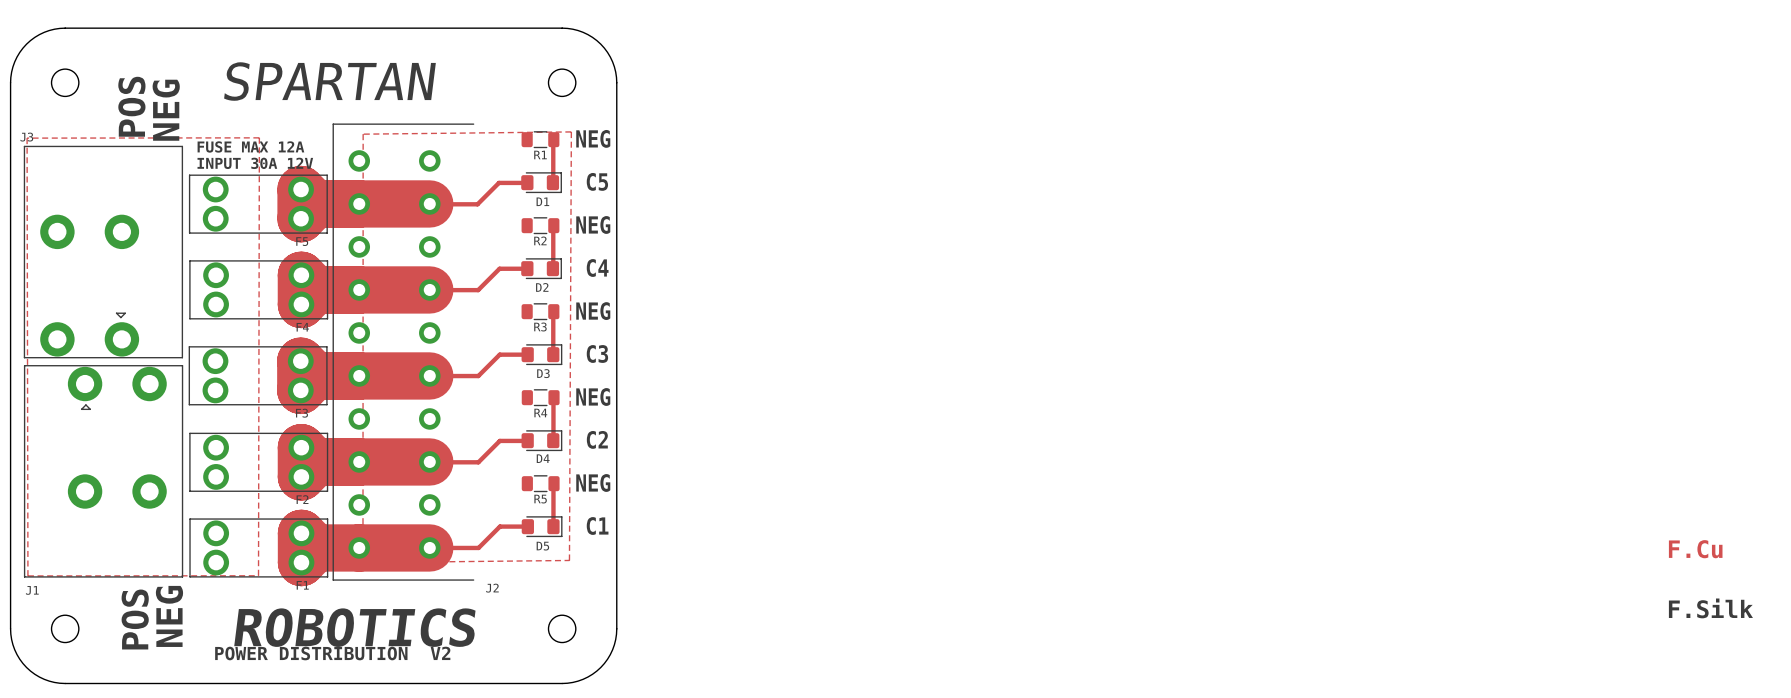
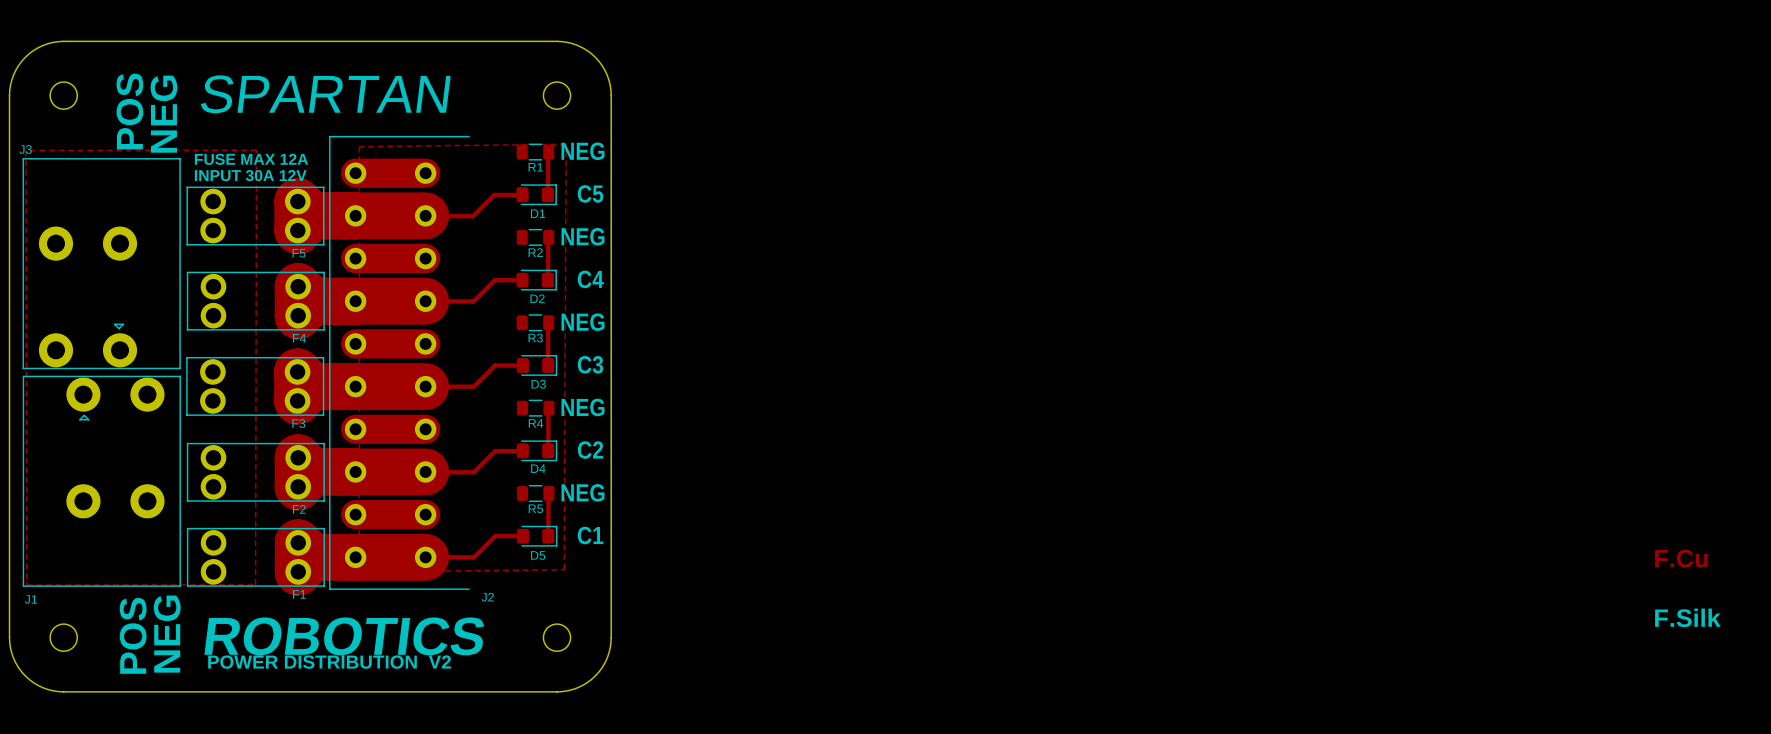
track: none -> (355, 173) (425, 173)
track: none -> (355, 258) (425, 258)
track: none -> (355, 343) (425, 343)
track: none -> (355, 429) (425, 429)
track: none -> (355, 514) (425, 514)

